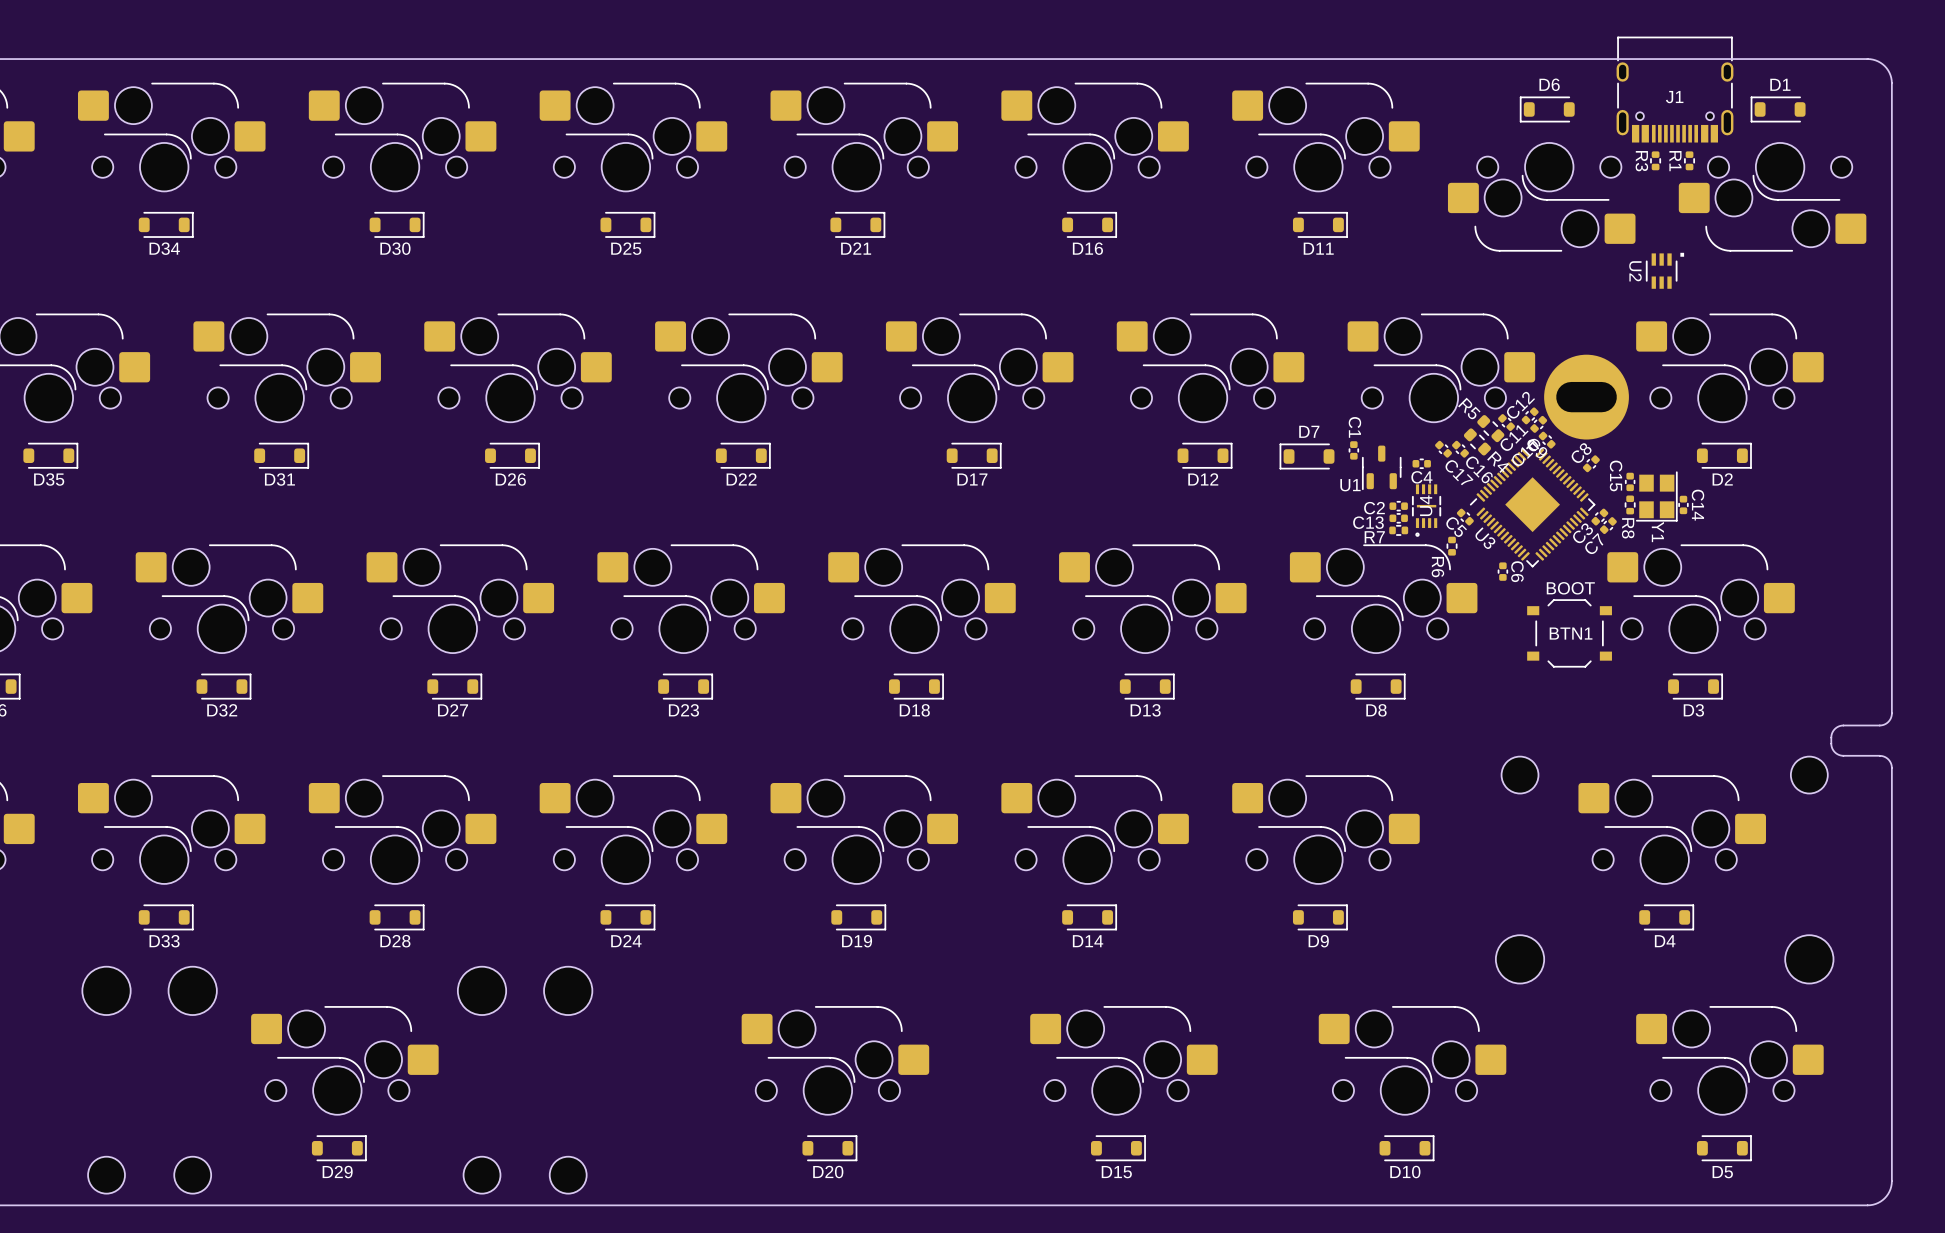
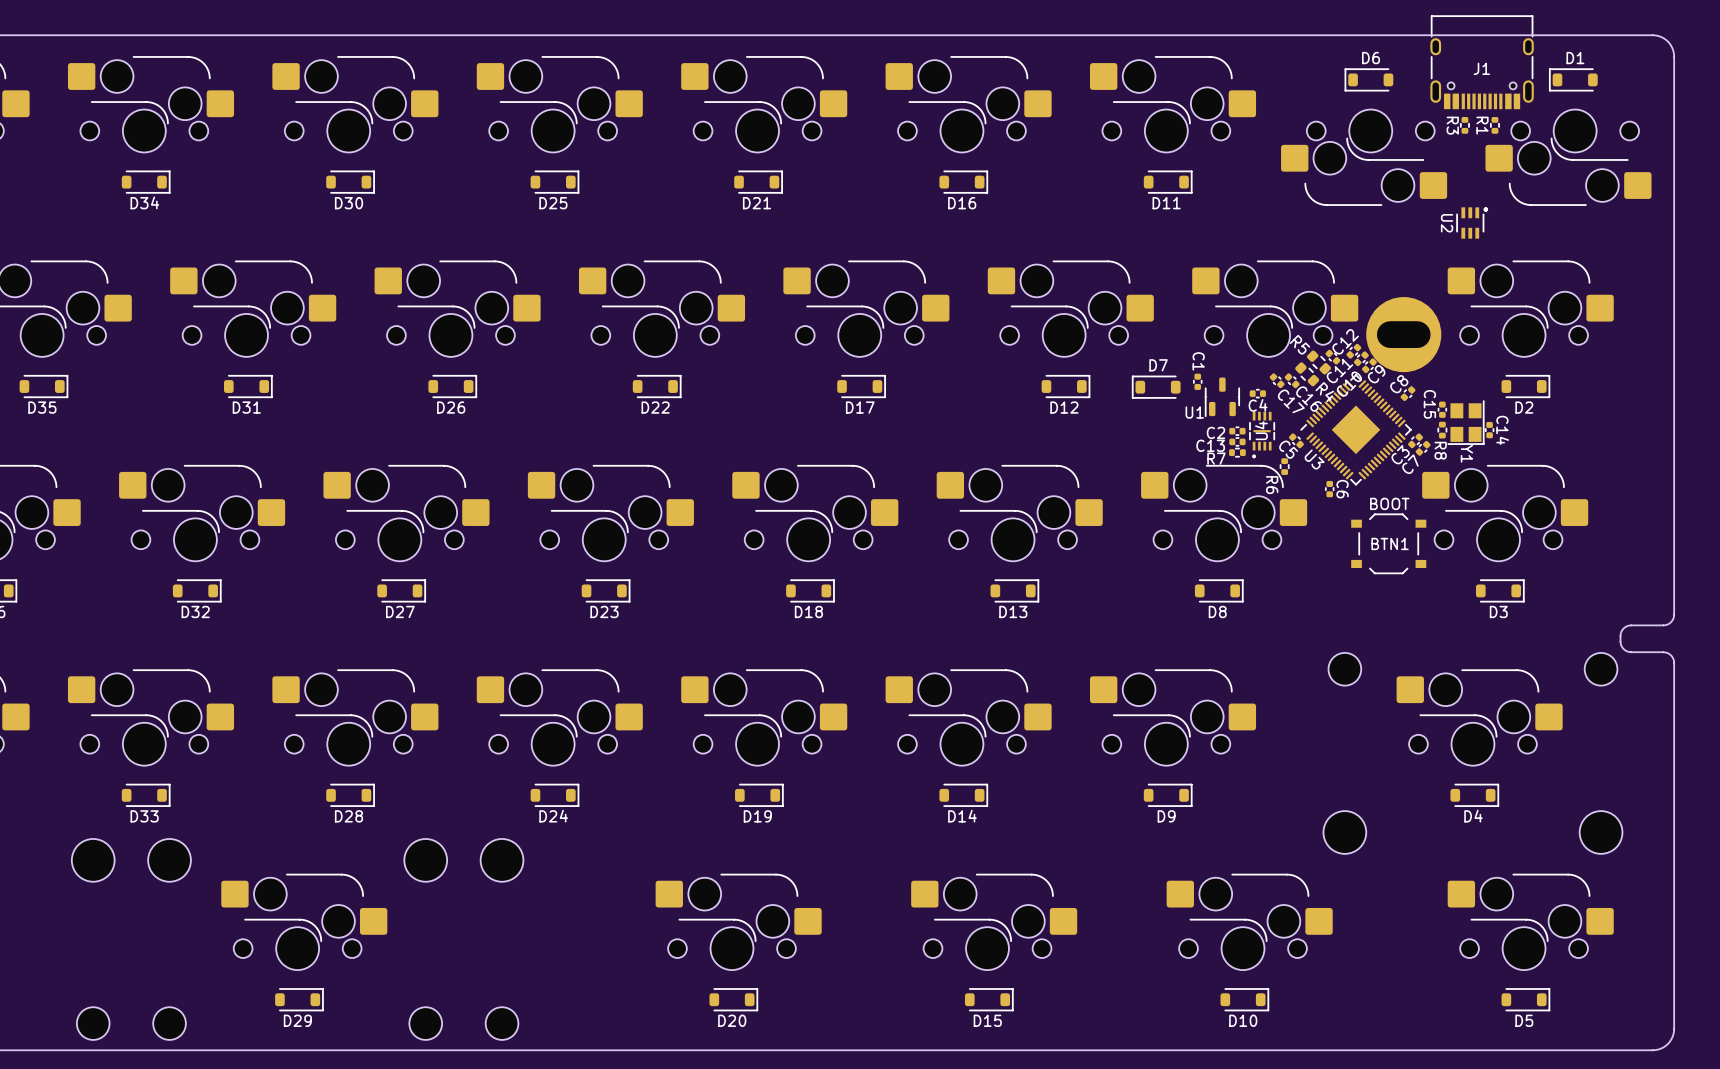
C9 rotation: 0° (1547, 440) -> 90° clockwise (1369, 365)

